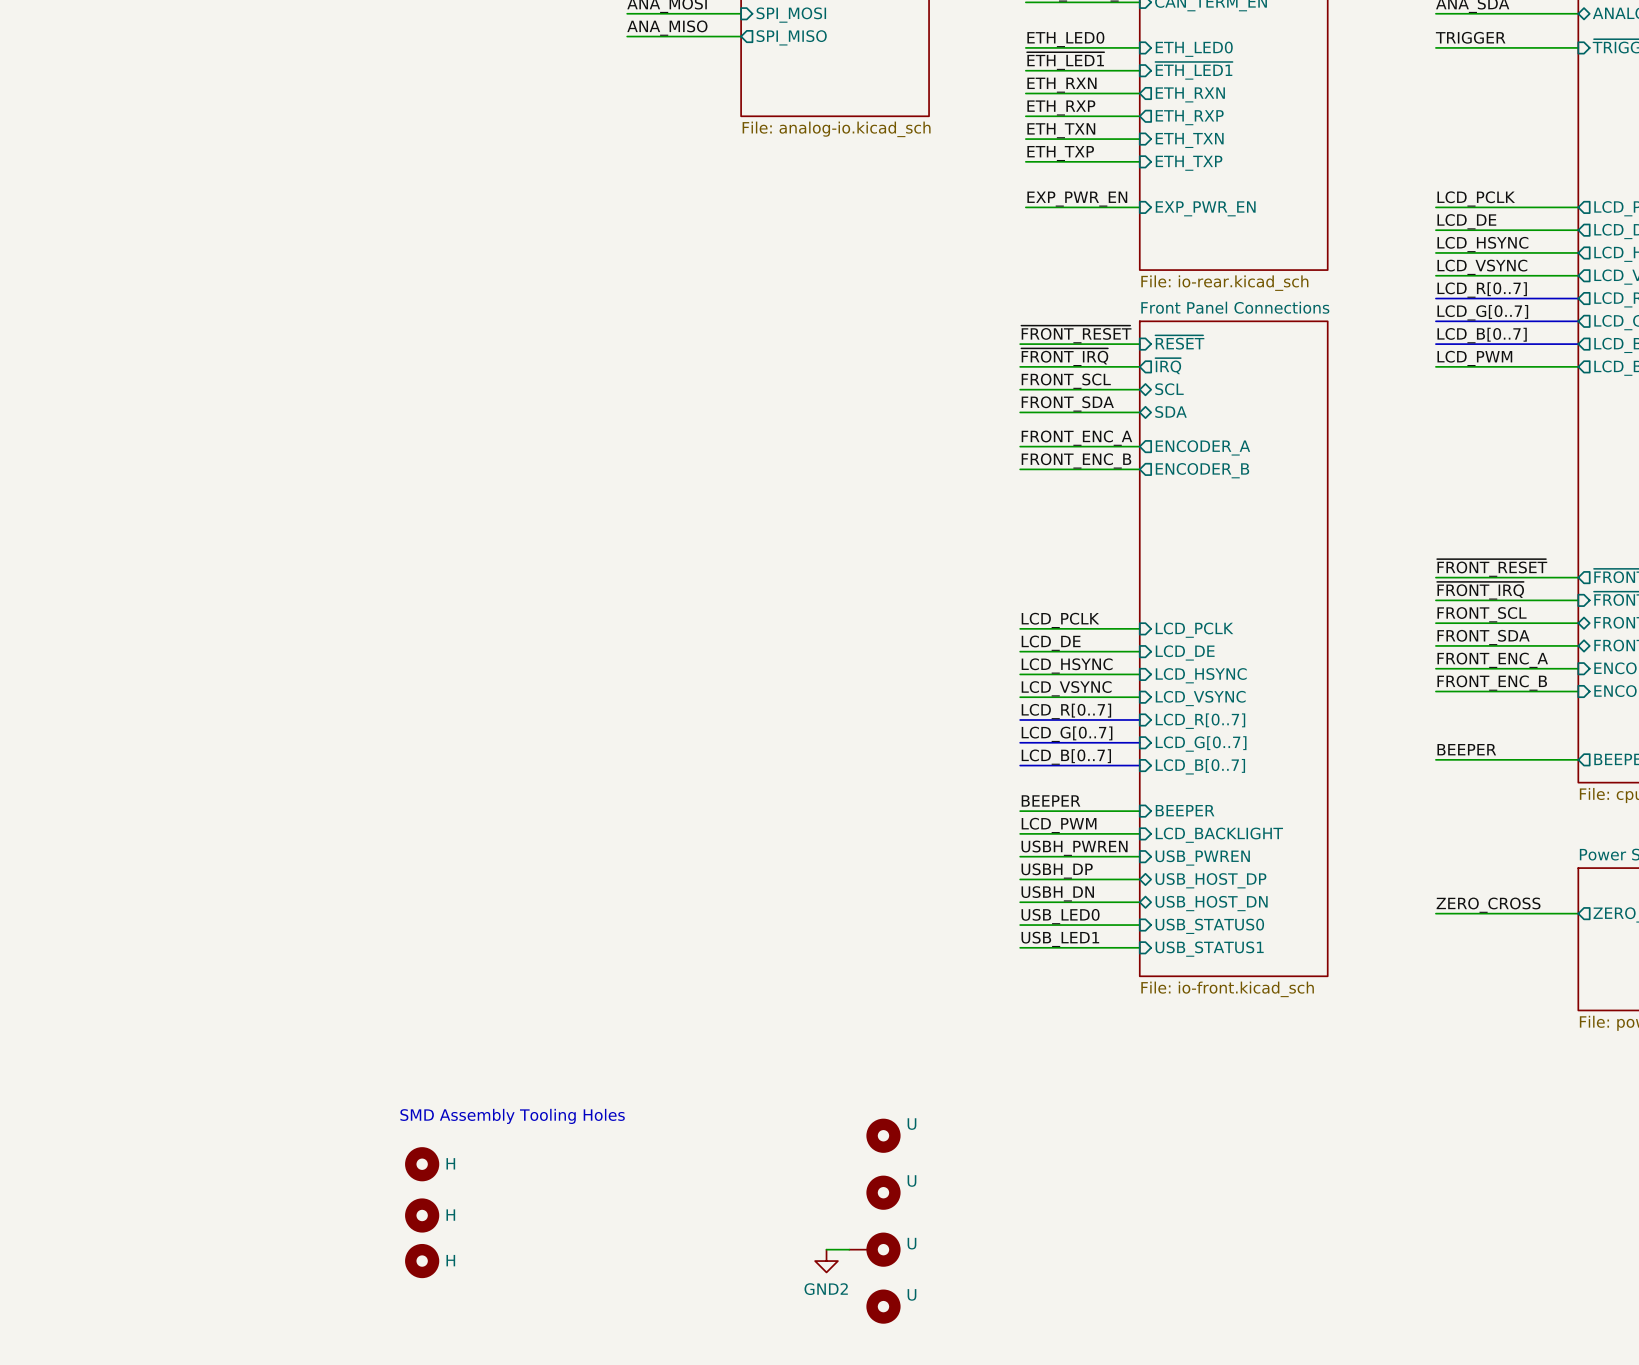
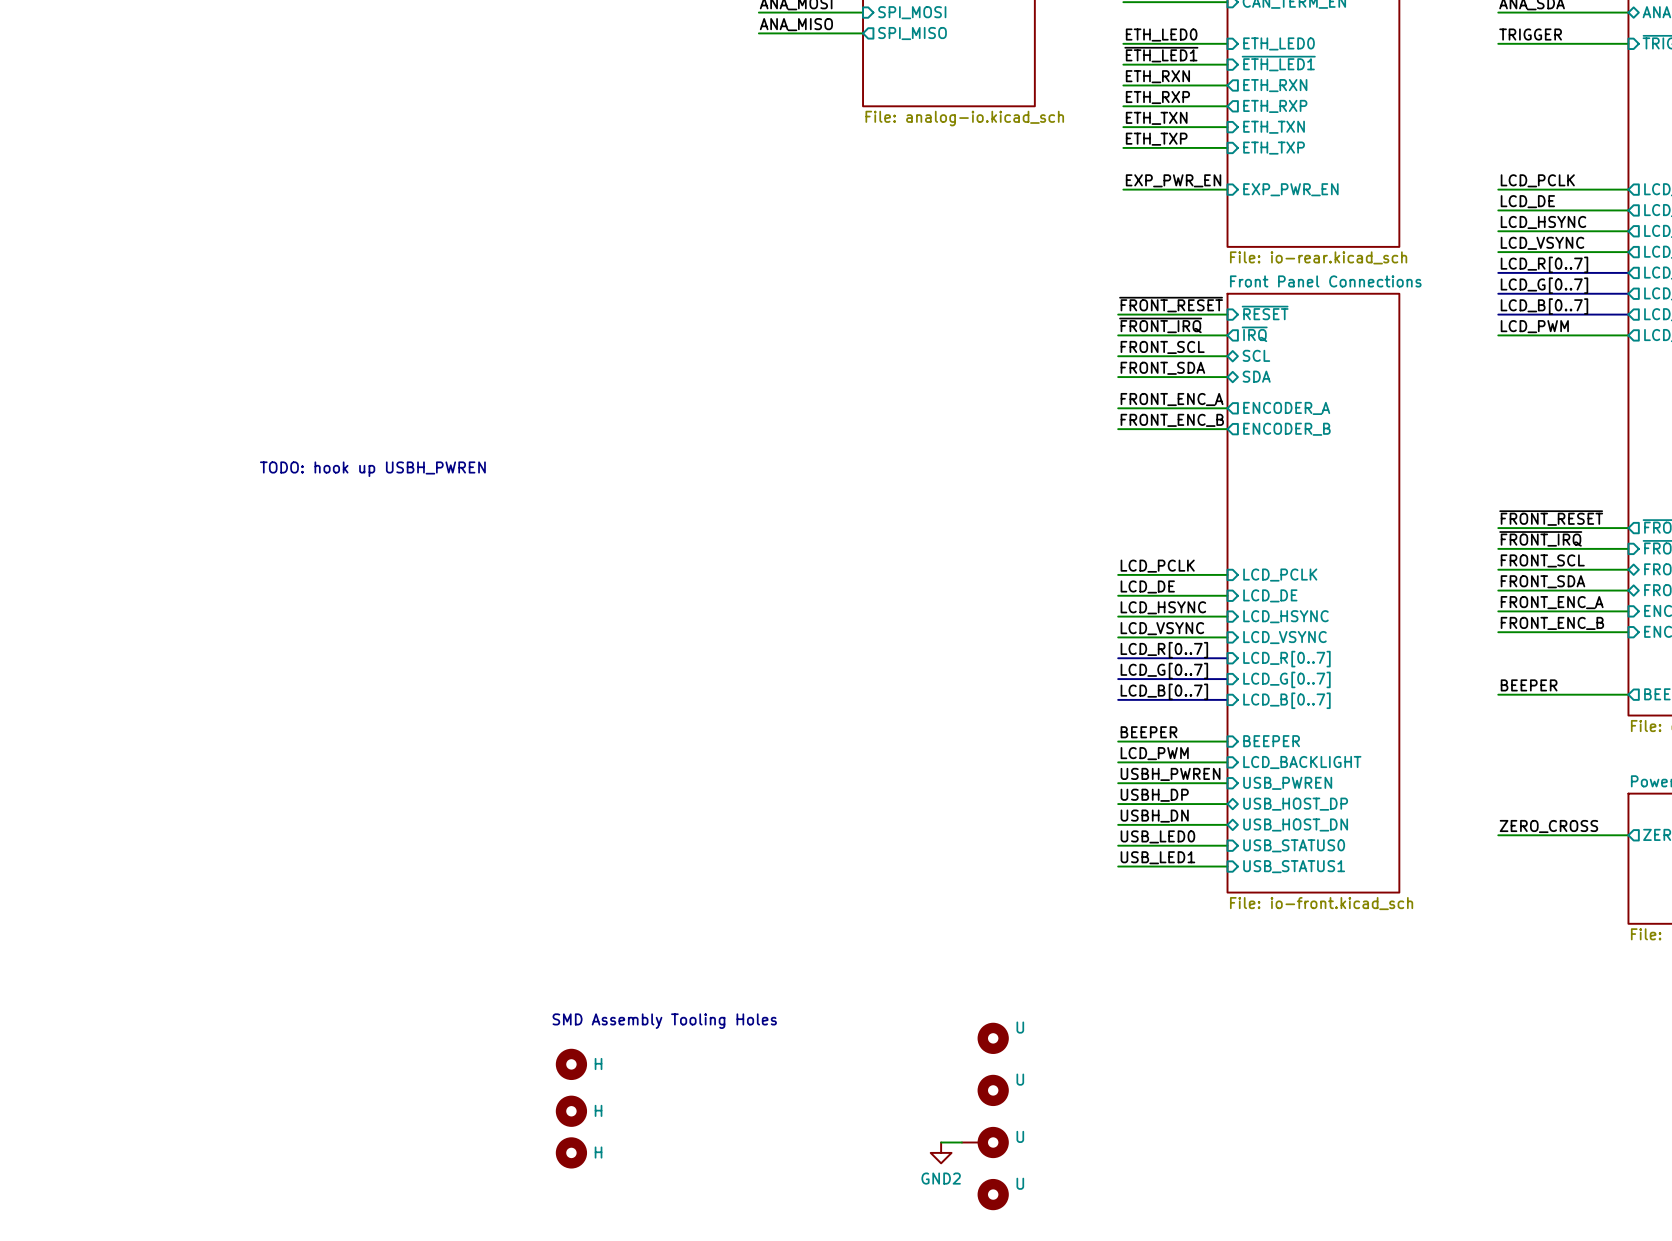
text: none -> TODO: hook up USBH_PWREN (372, 469)

